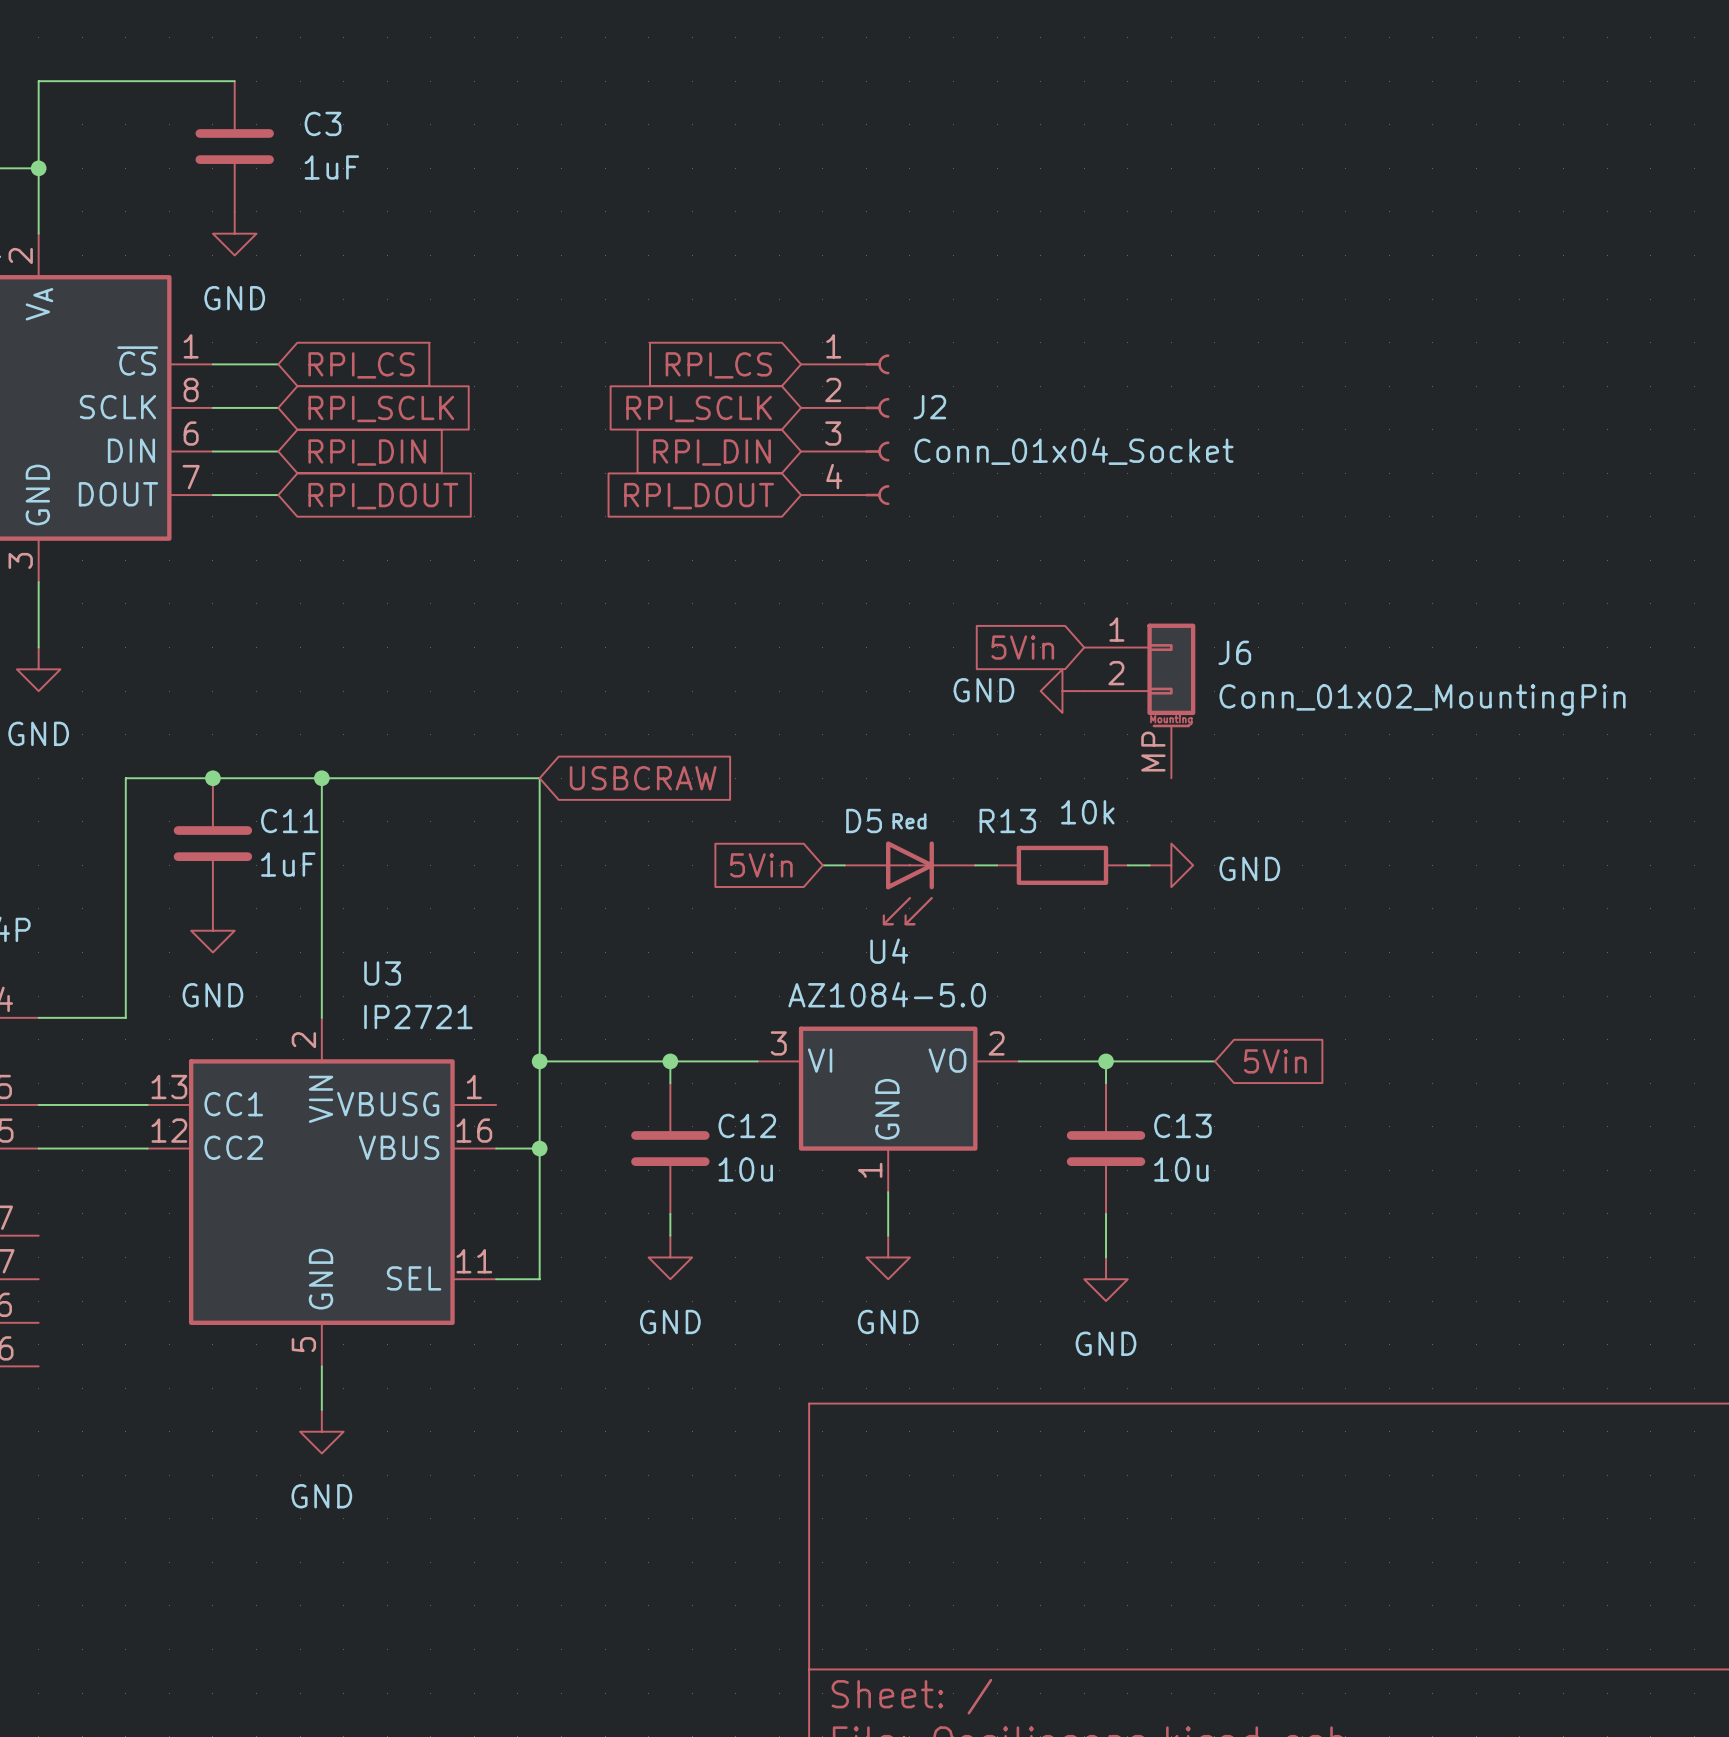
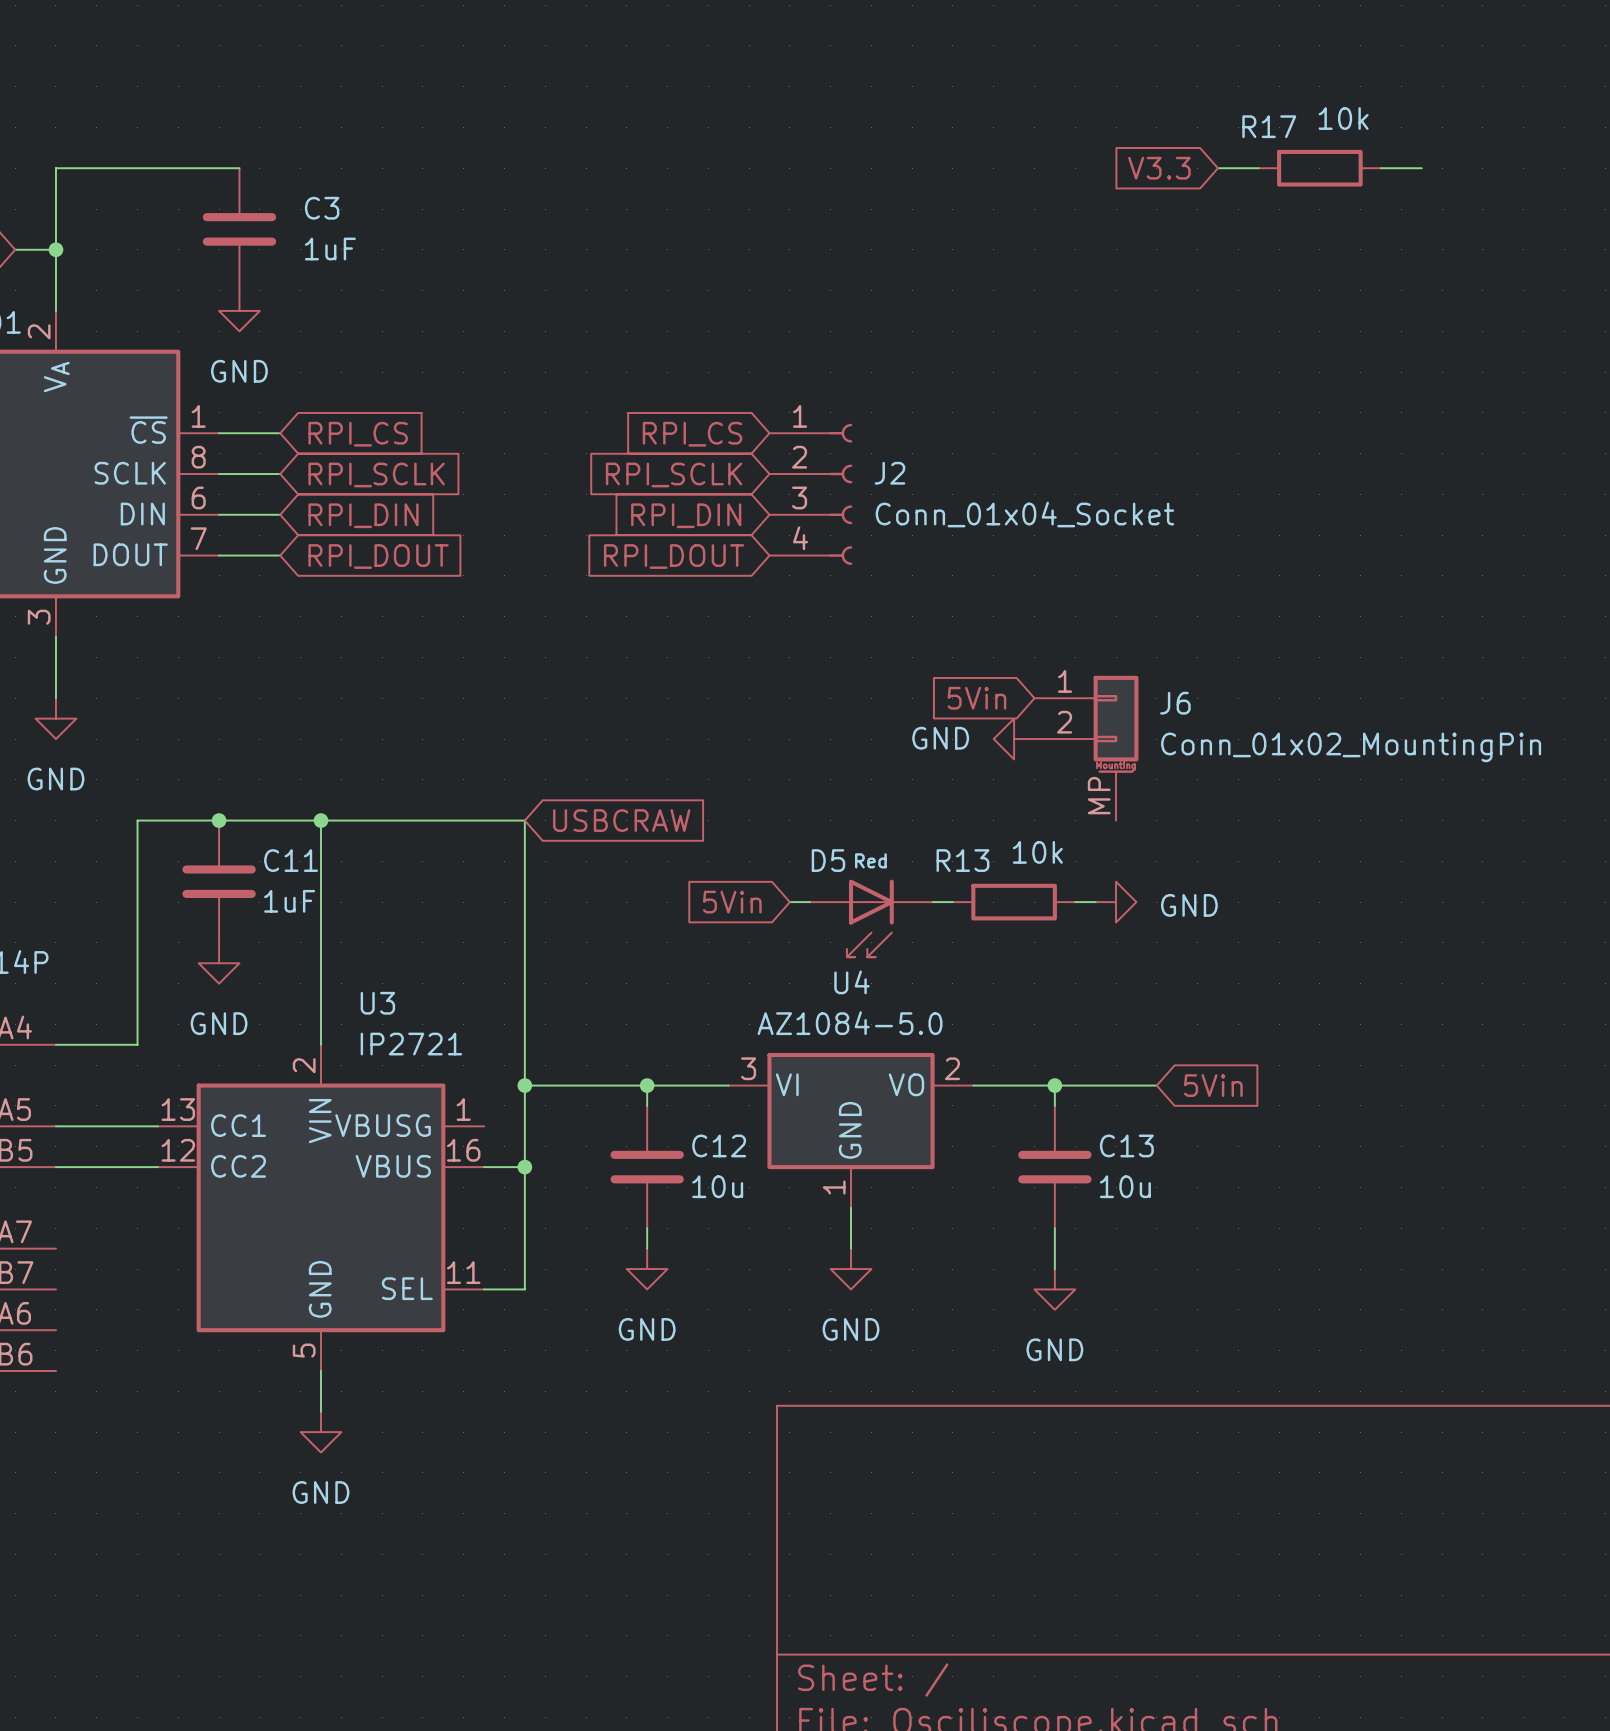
global label: none -> V3.3 (1159, 168)
wire: none -> (1217, 168) (1258, 168)
R17: none -> 10k (1319, 168)
wire: none -> (1381, 168) (1421, 168)

